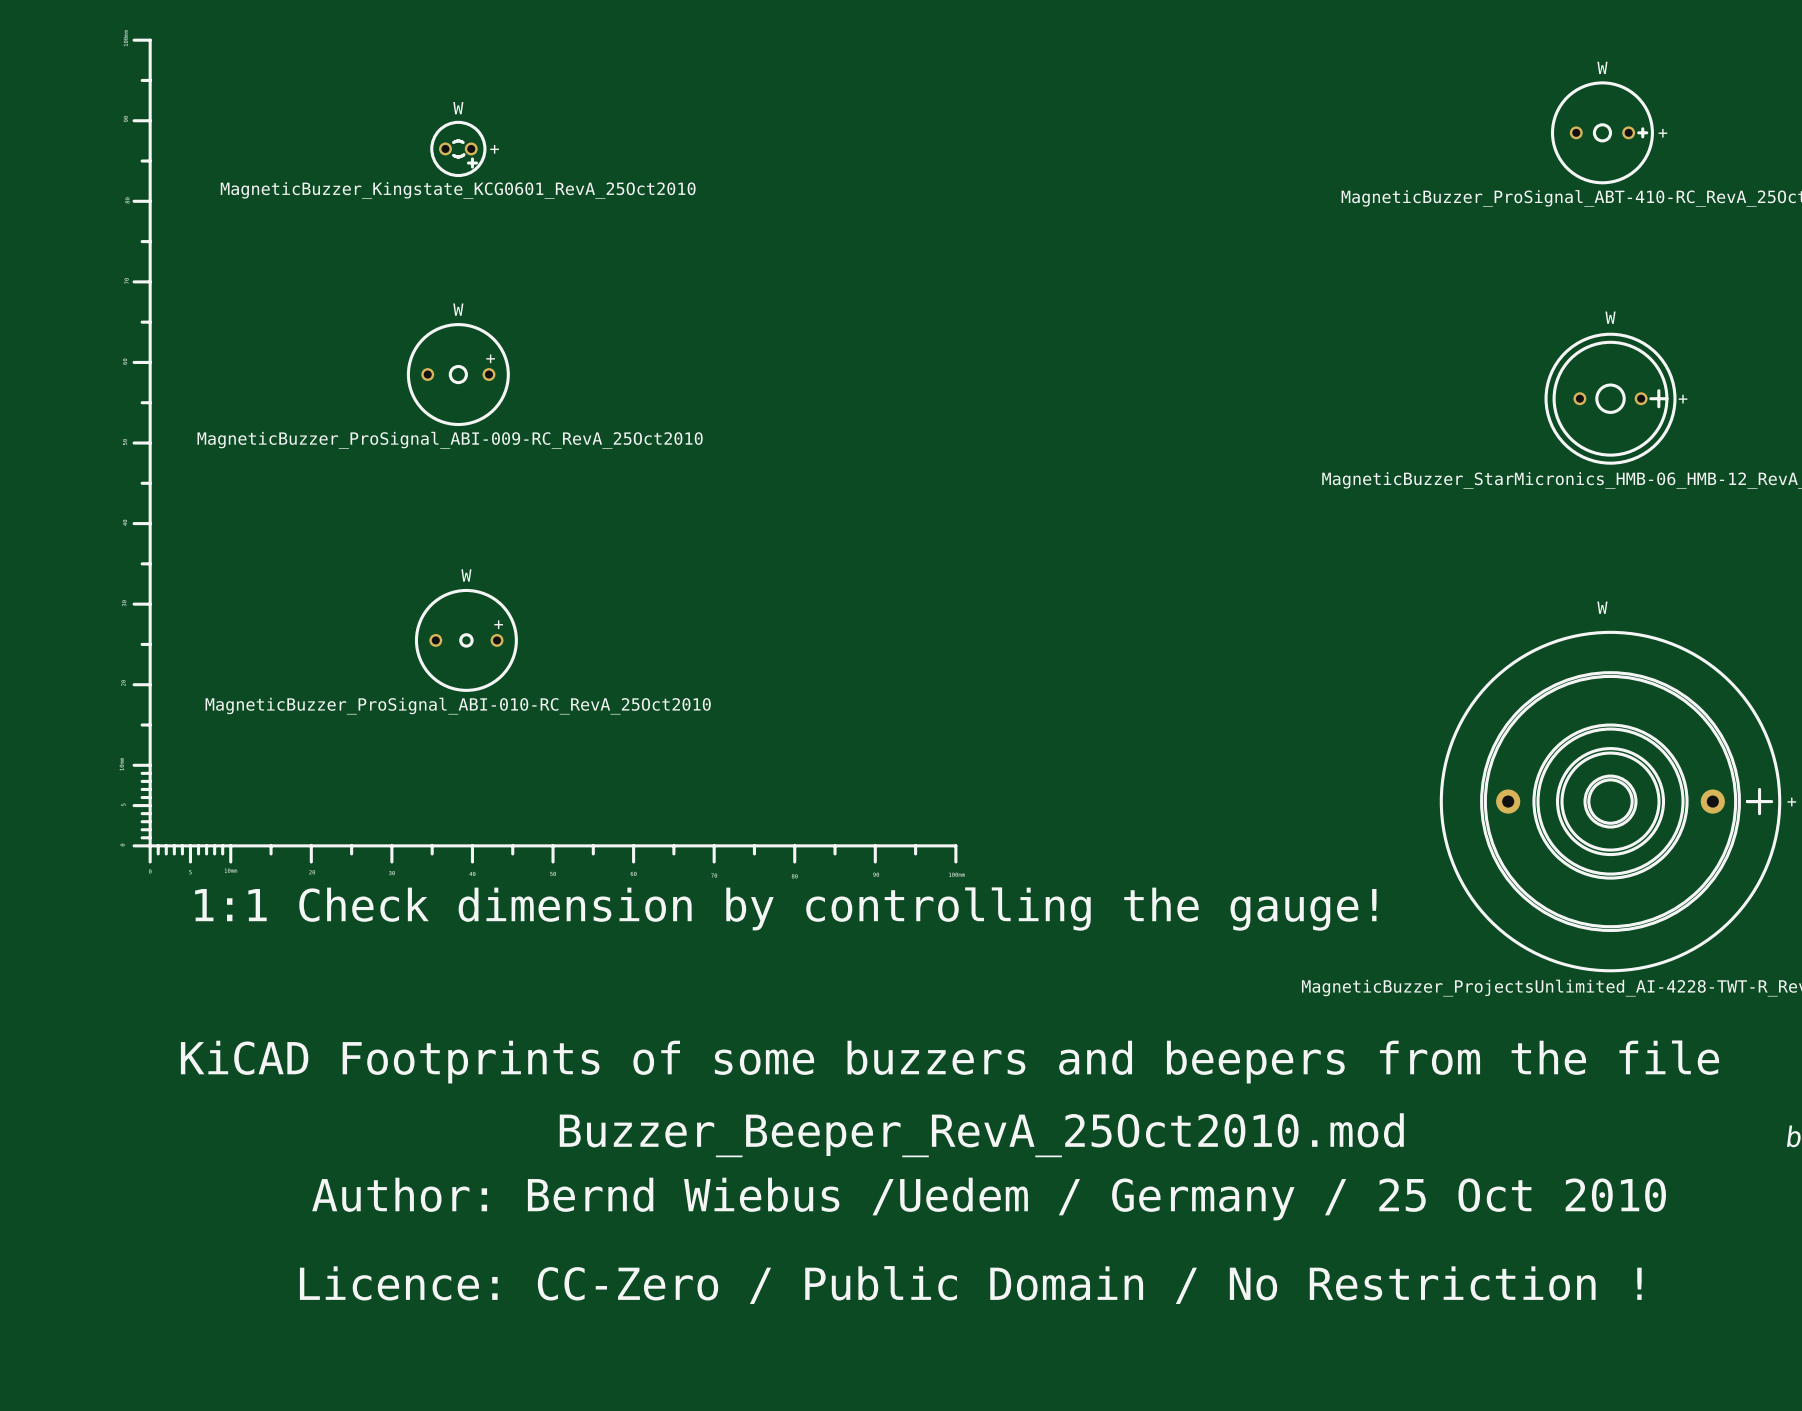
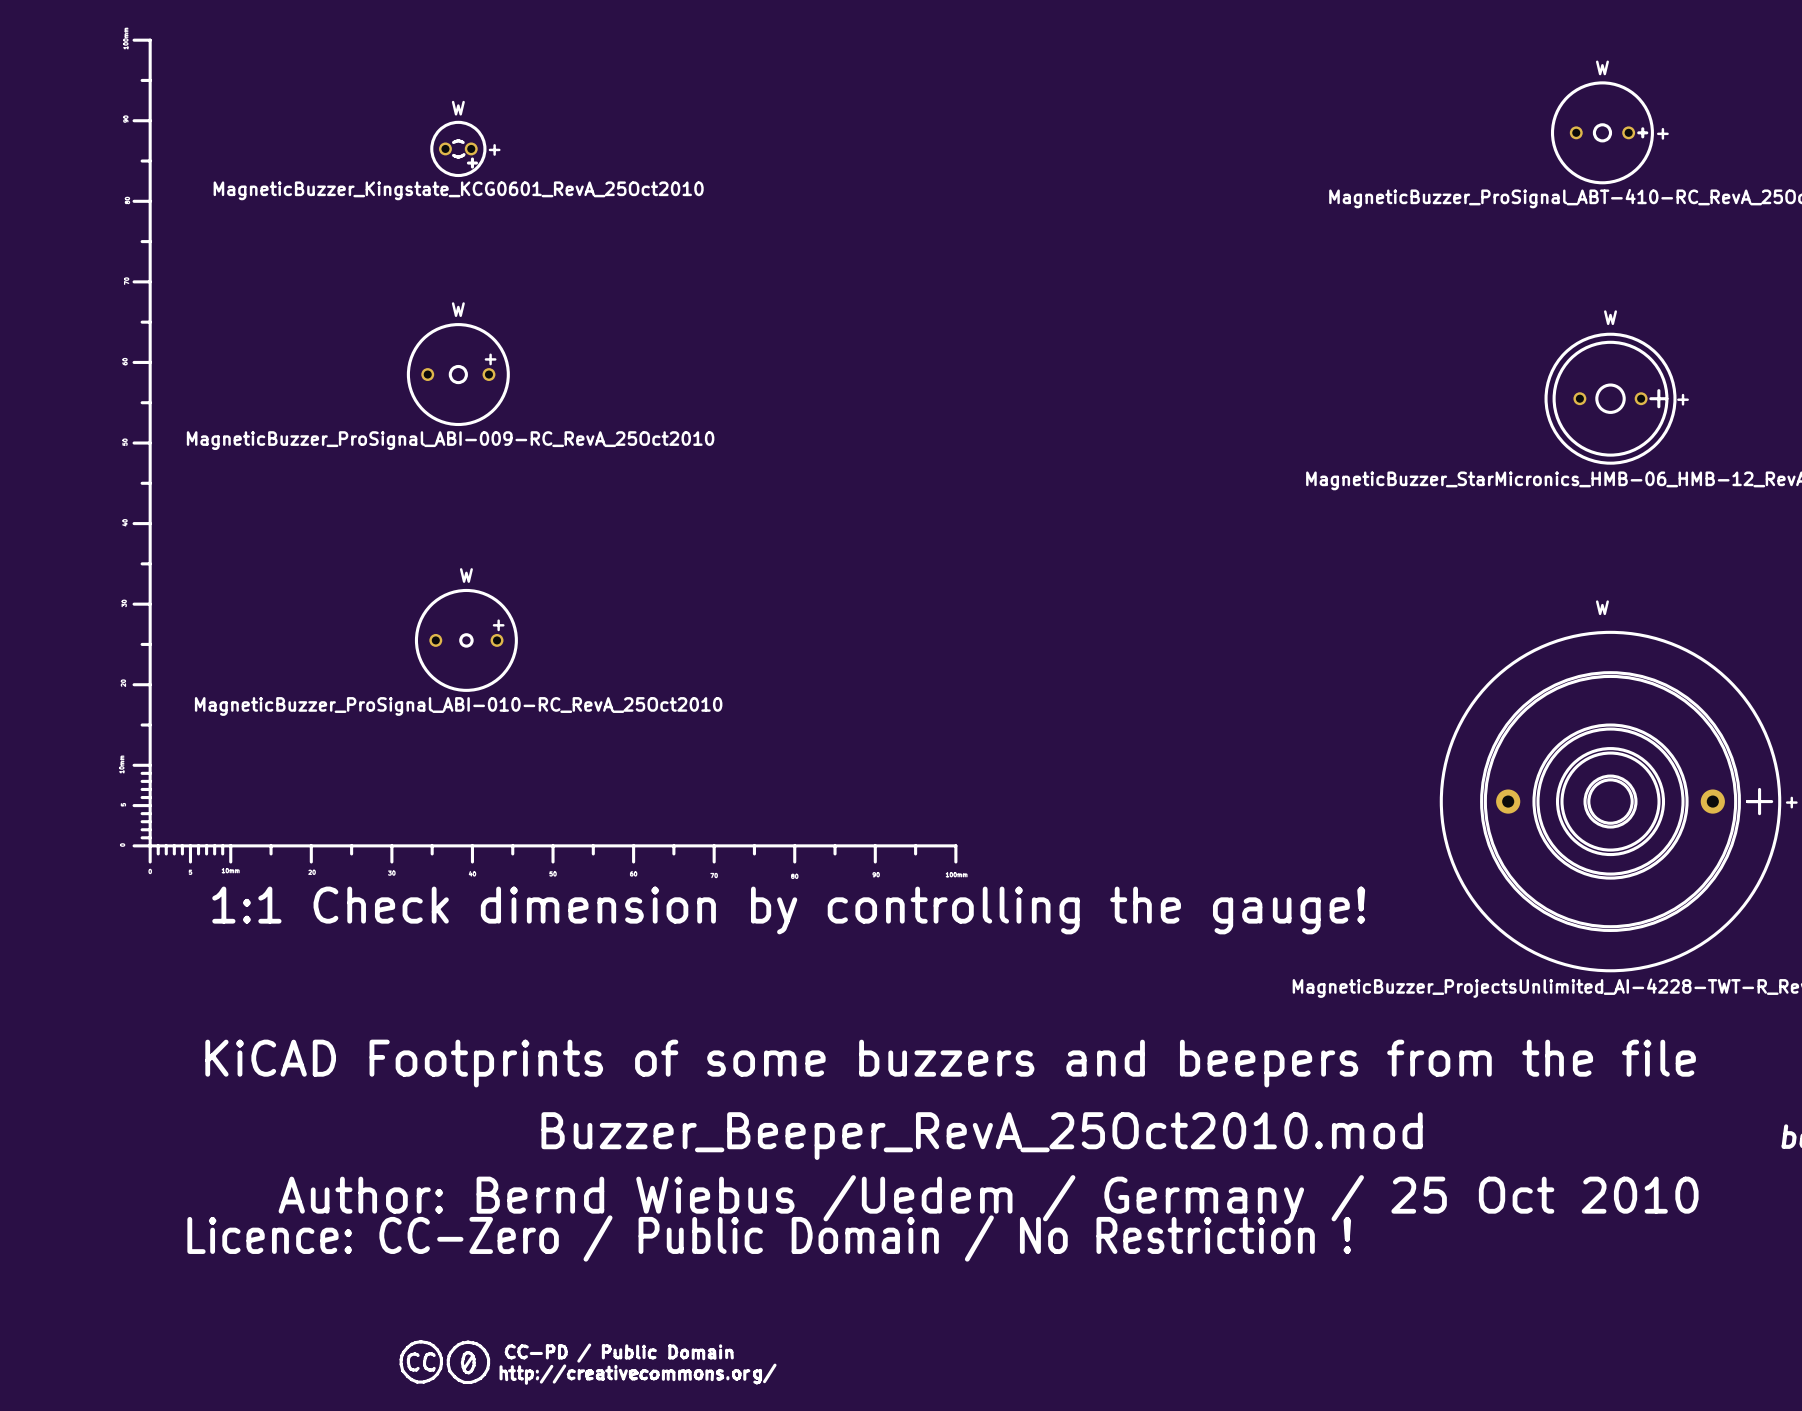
text: none -> Licence: CC-Zero / Public Domain / No Restriction ! (769, 1238)
text: Licence: CC-Zero / Public Domain / No Restriction ! (970, 1285) -> none
drawing: none -> [399, 1340, 777, 1385]

